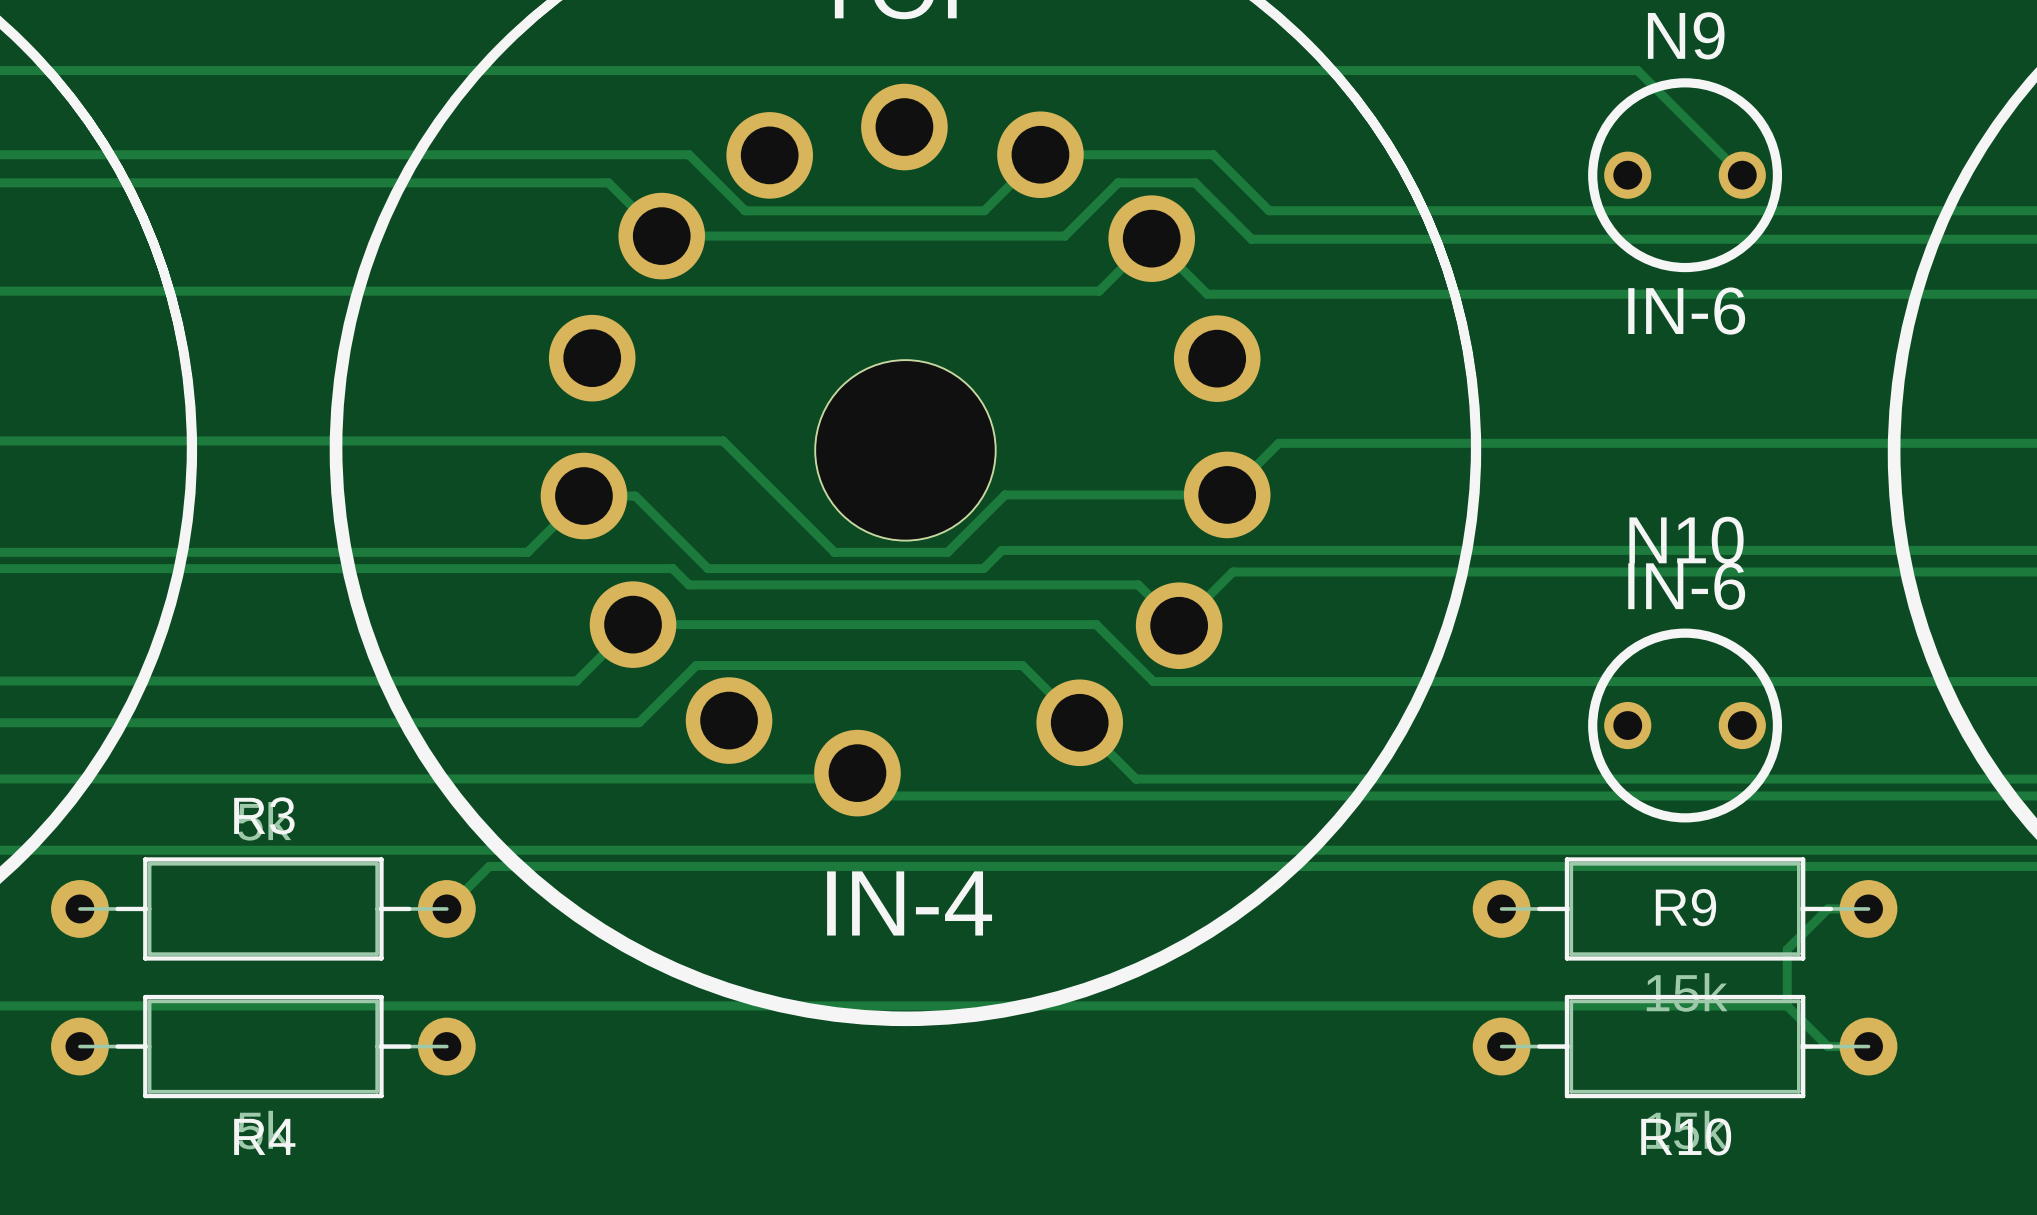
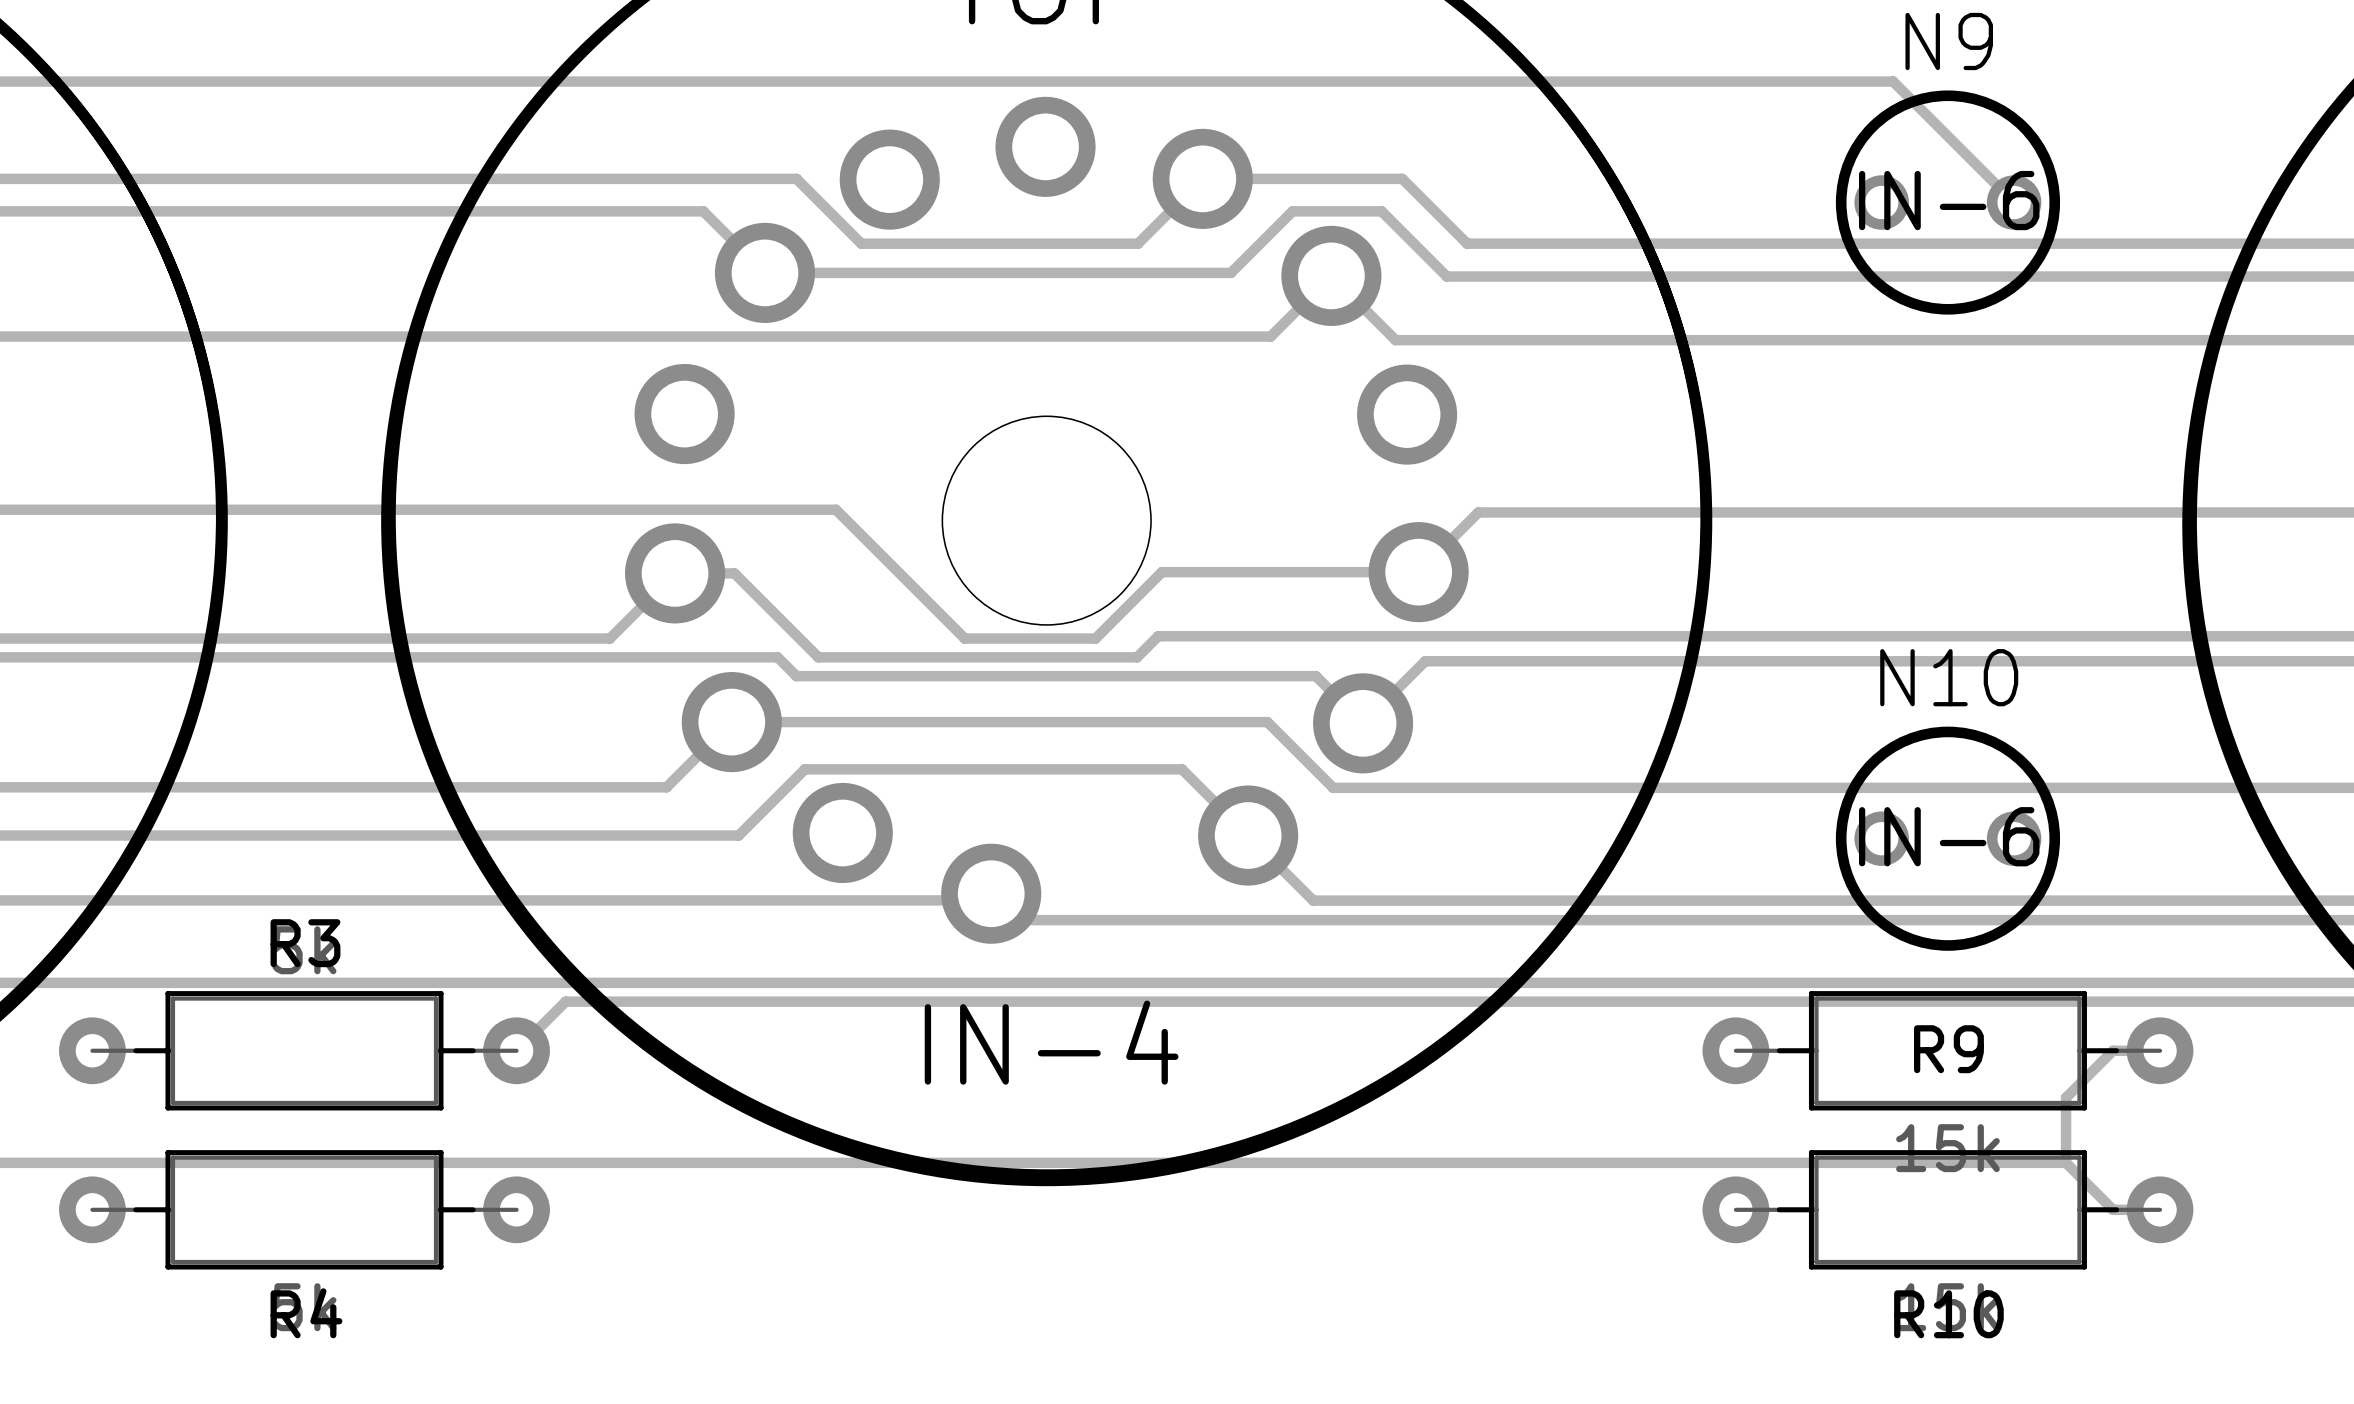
N9 value position: IN-6 (1686, 311) -> IN-6 (1949, 200)
N10 name position: N10 (1686, 540) -> N10 (1949, 677)
N10 value position: IN-6 (1686, 586) -> IN-6 (1949, 836)

